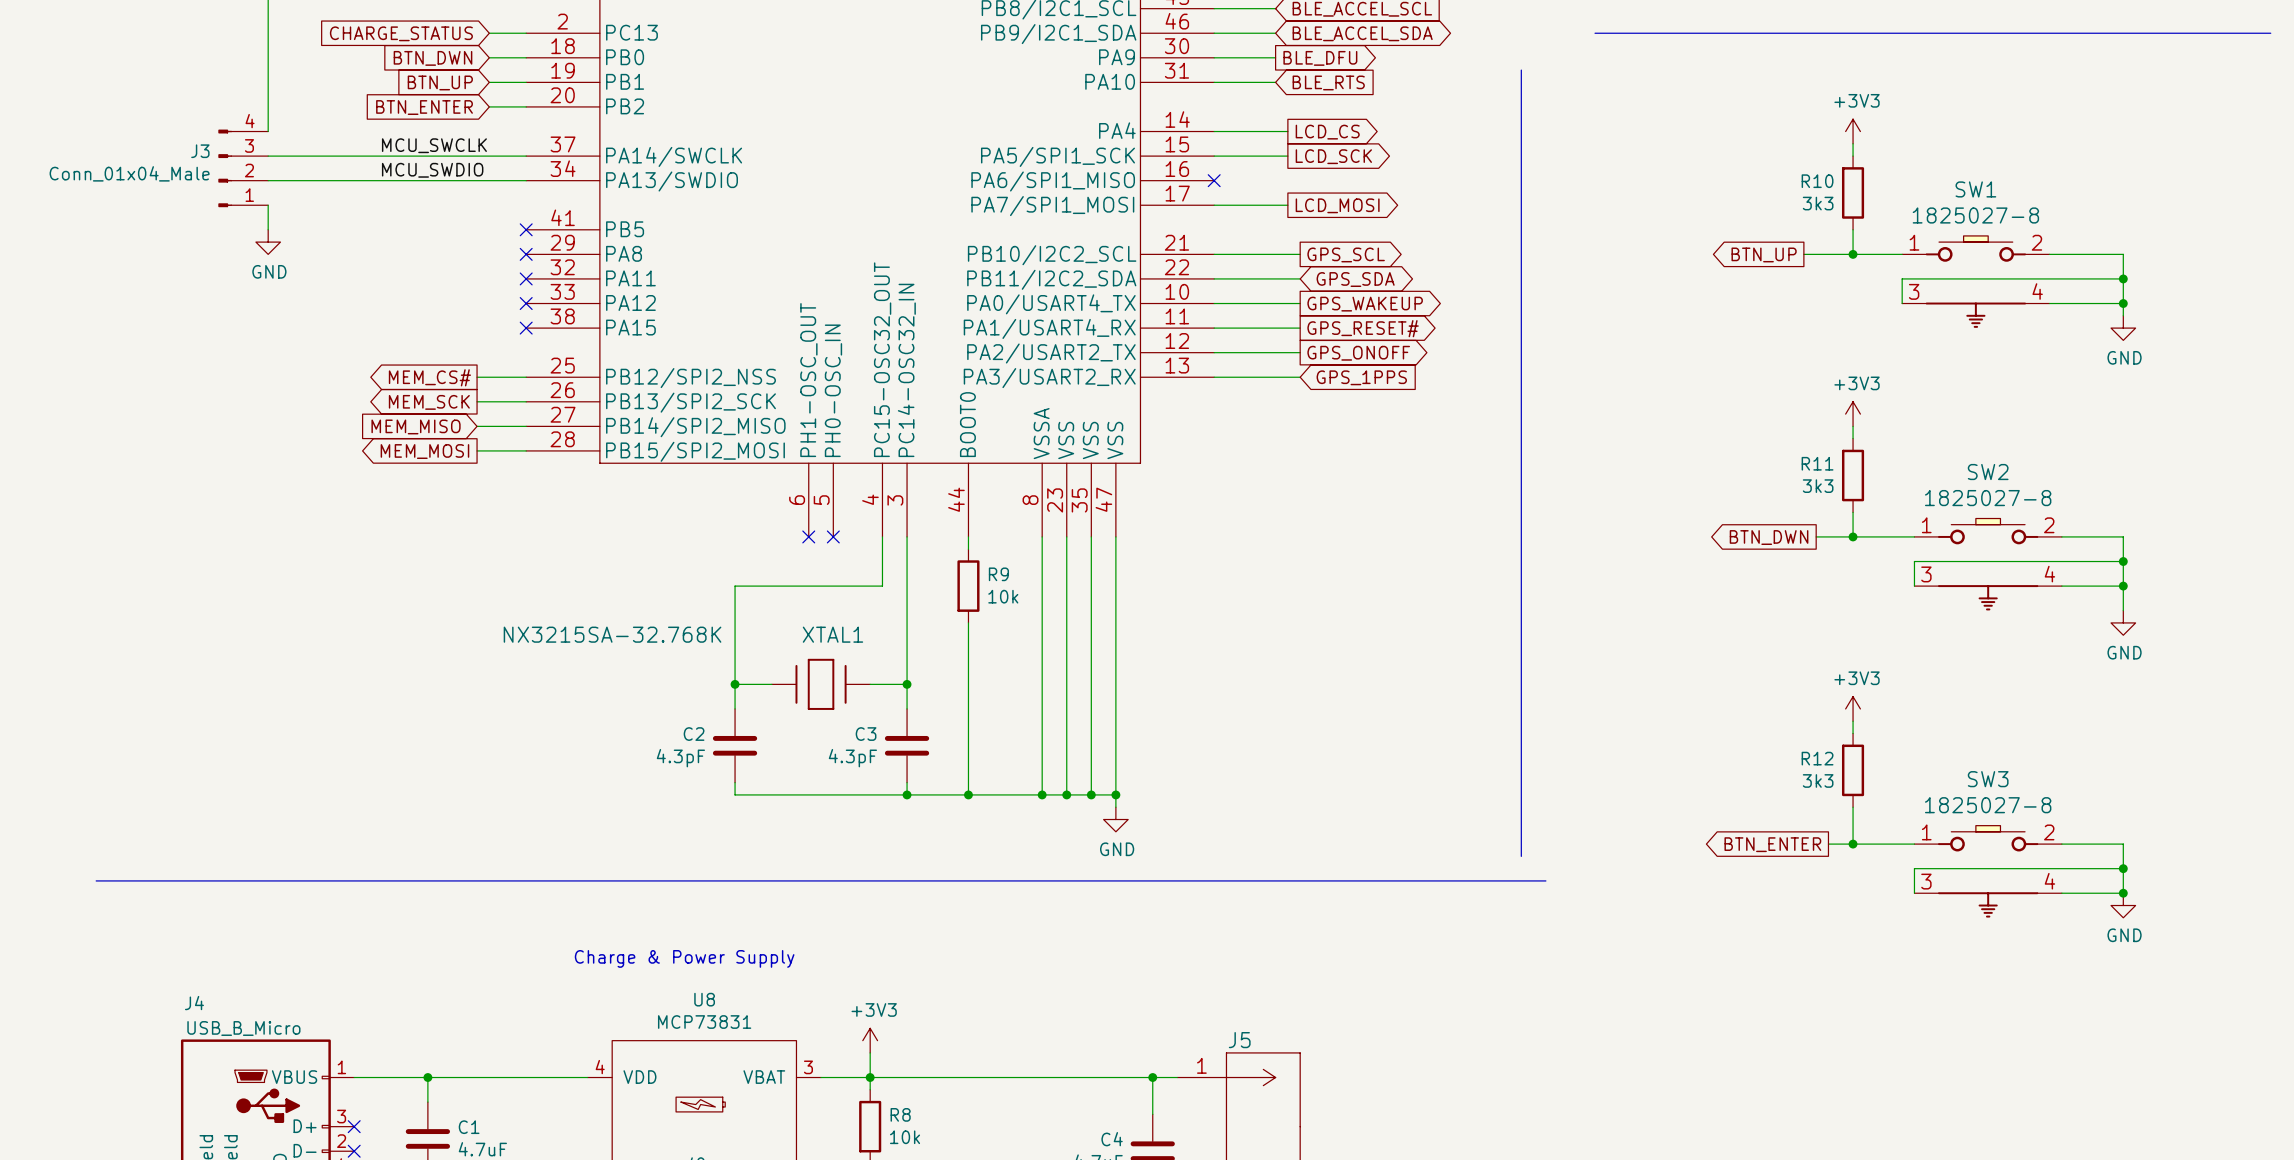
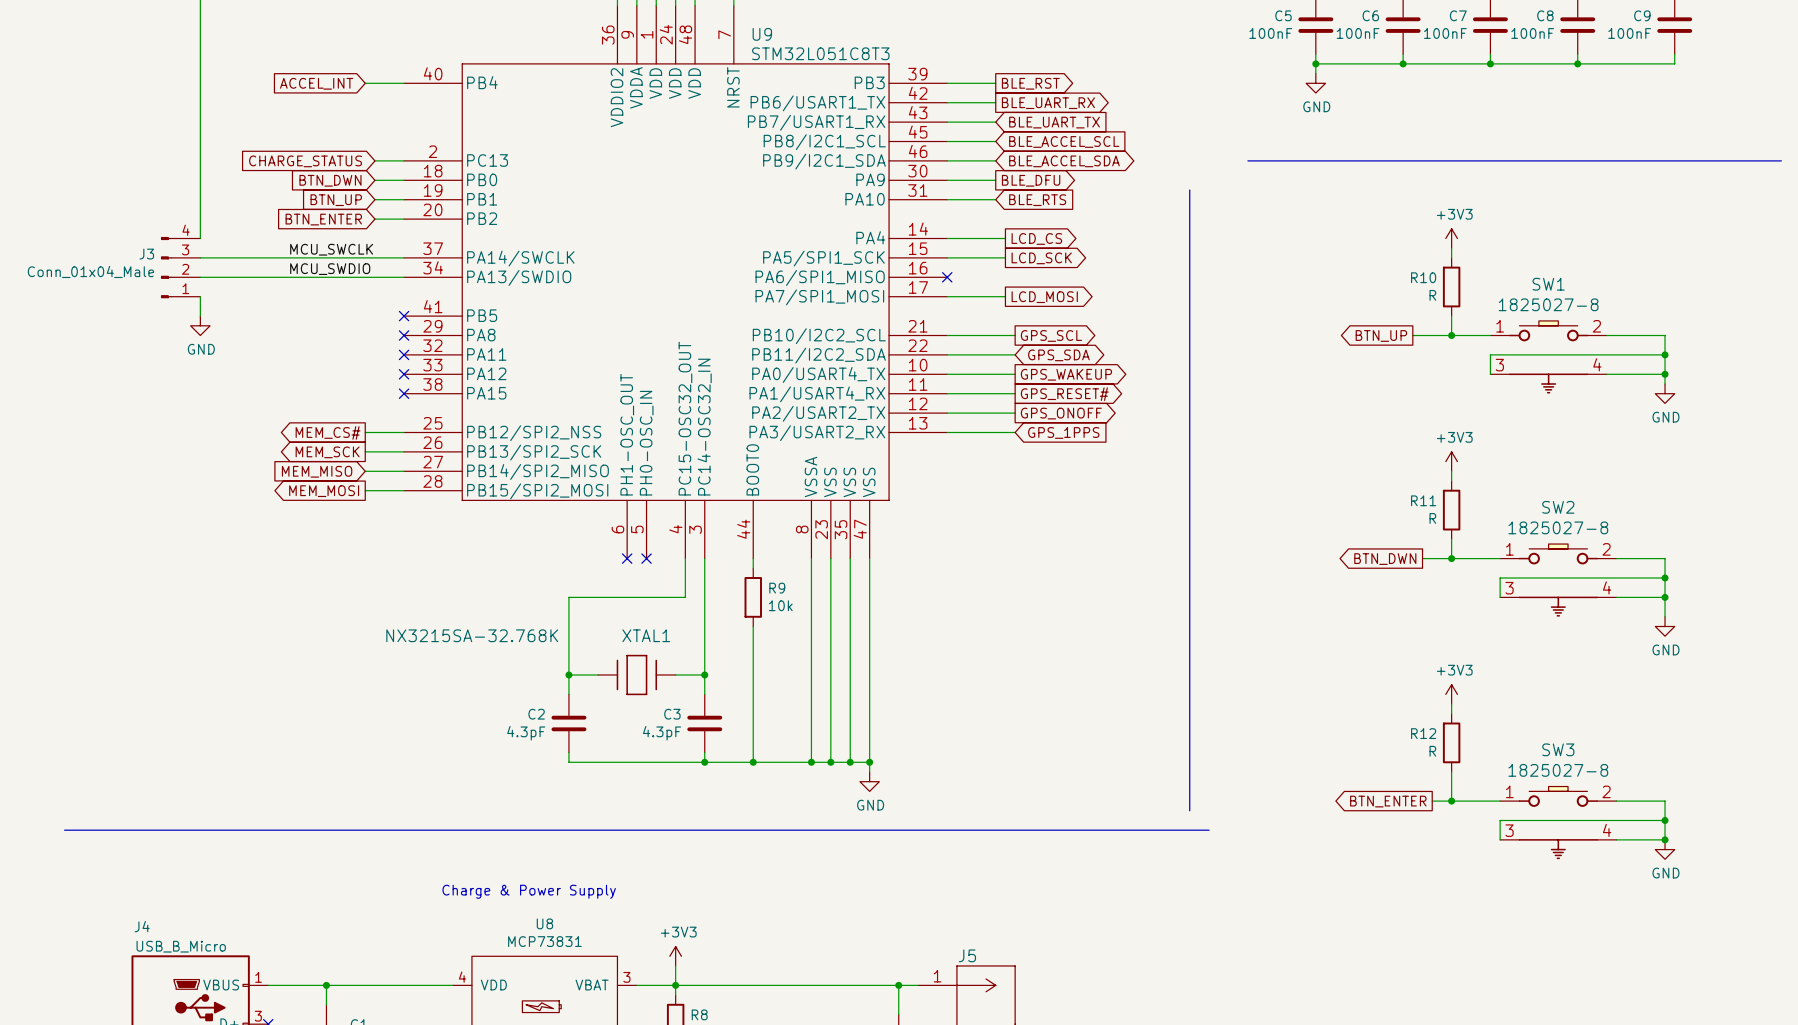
R10 value: 3k3 (1818, 203) -> R (1432, 295)
R11 value: 3k3 (1818, 486) -> R (1432, 518)
R12 value: 3k3 (1818, 780) -> R (1432, 751)

